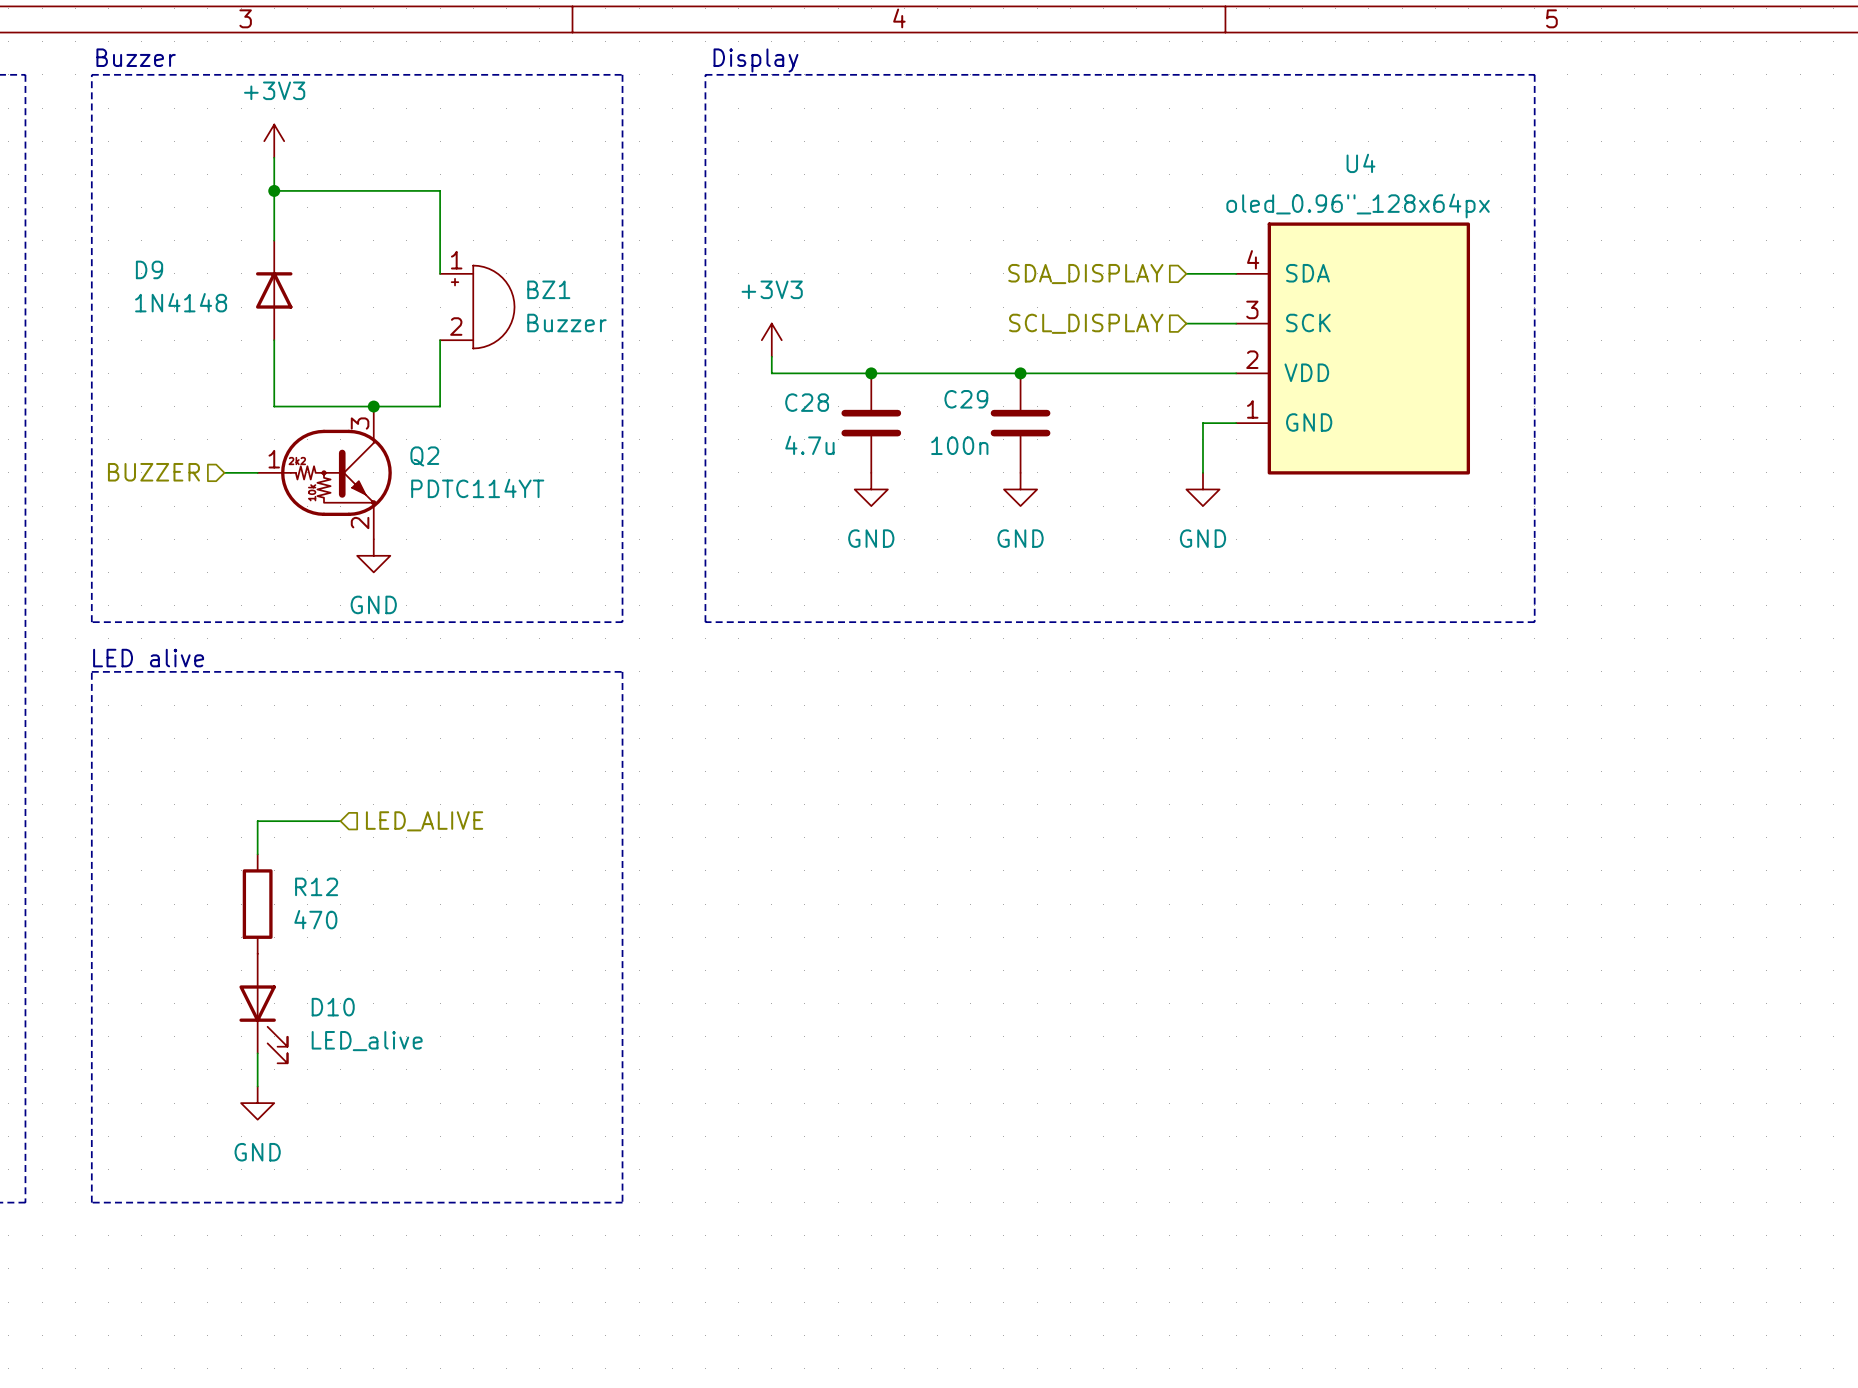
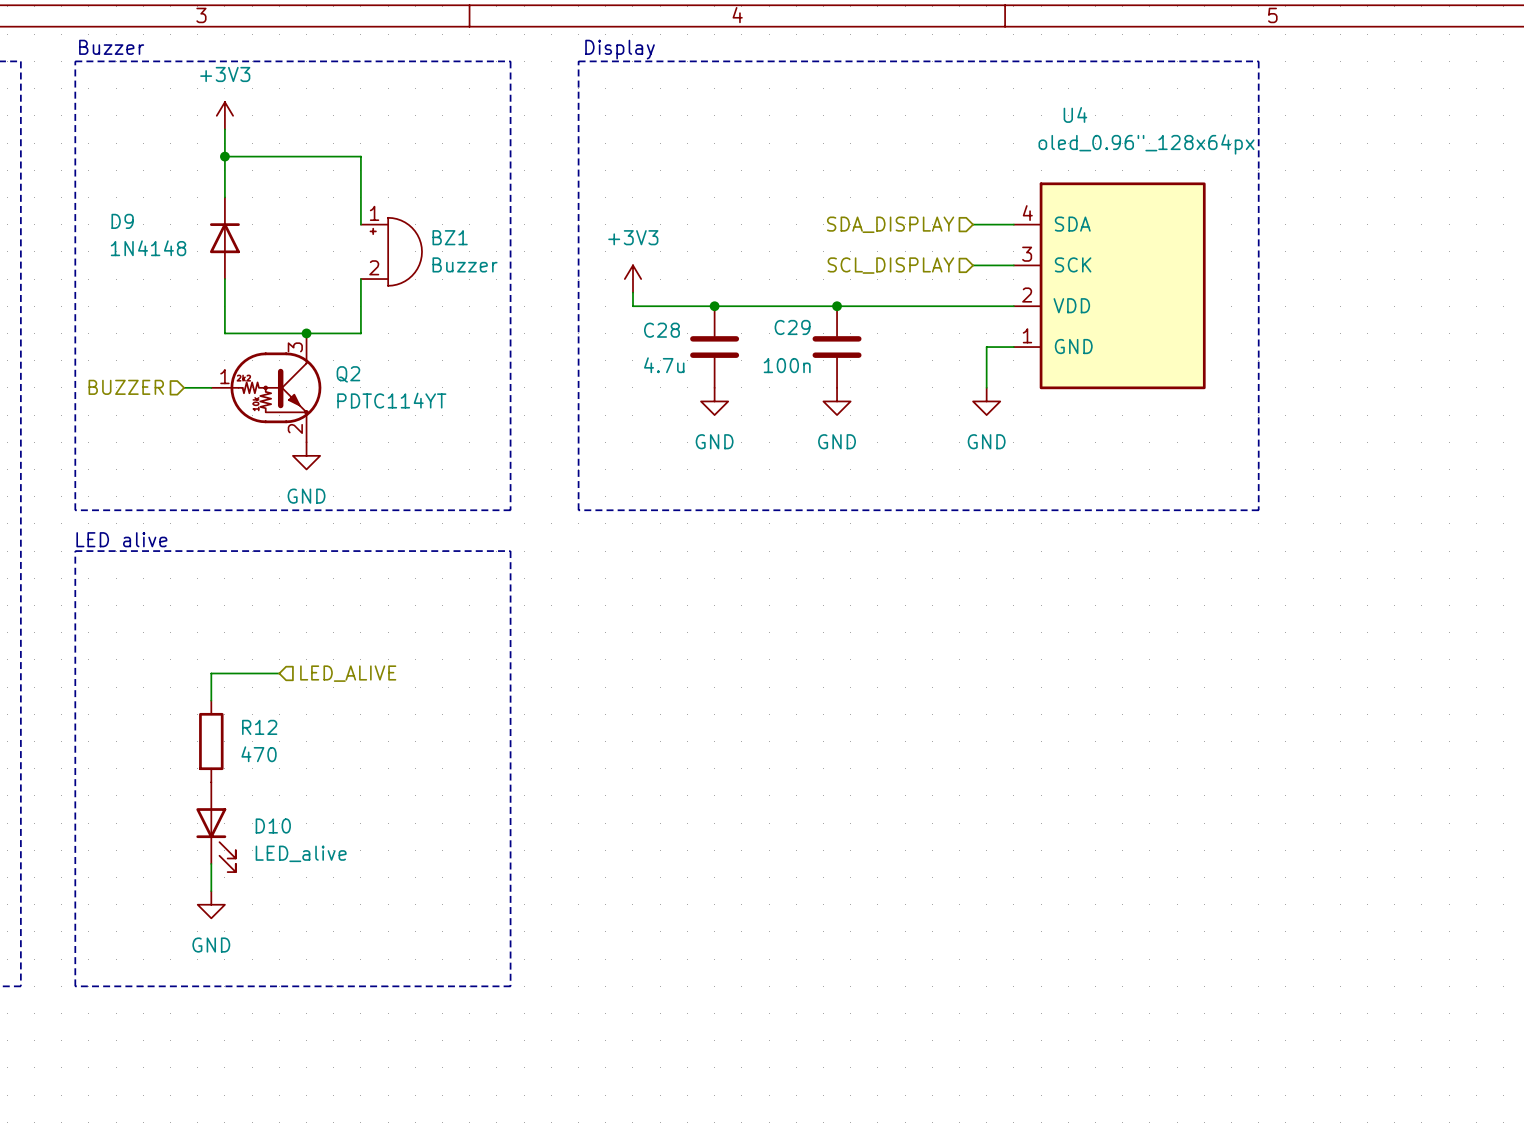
U4 name position: U4 (1360, 163) -> U4 (1075, 114)
U4 value position: oled_0.96"_128x64px (1358, 205) -> oled_0.96"_128x64px (1146, 144)

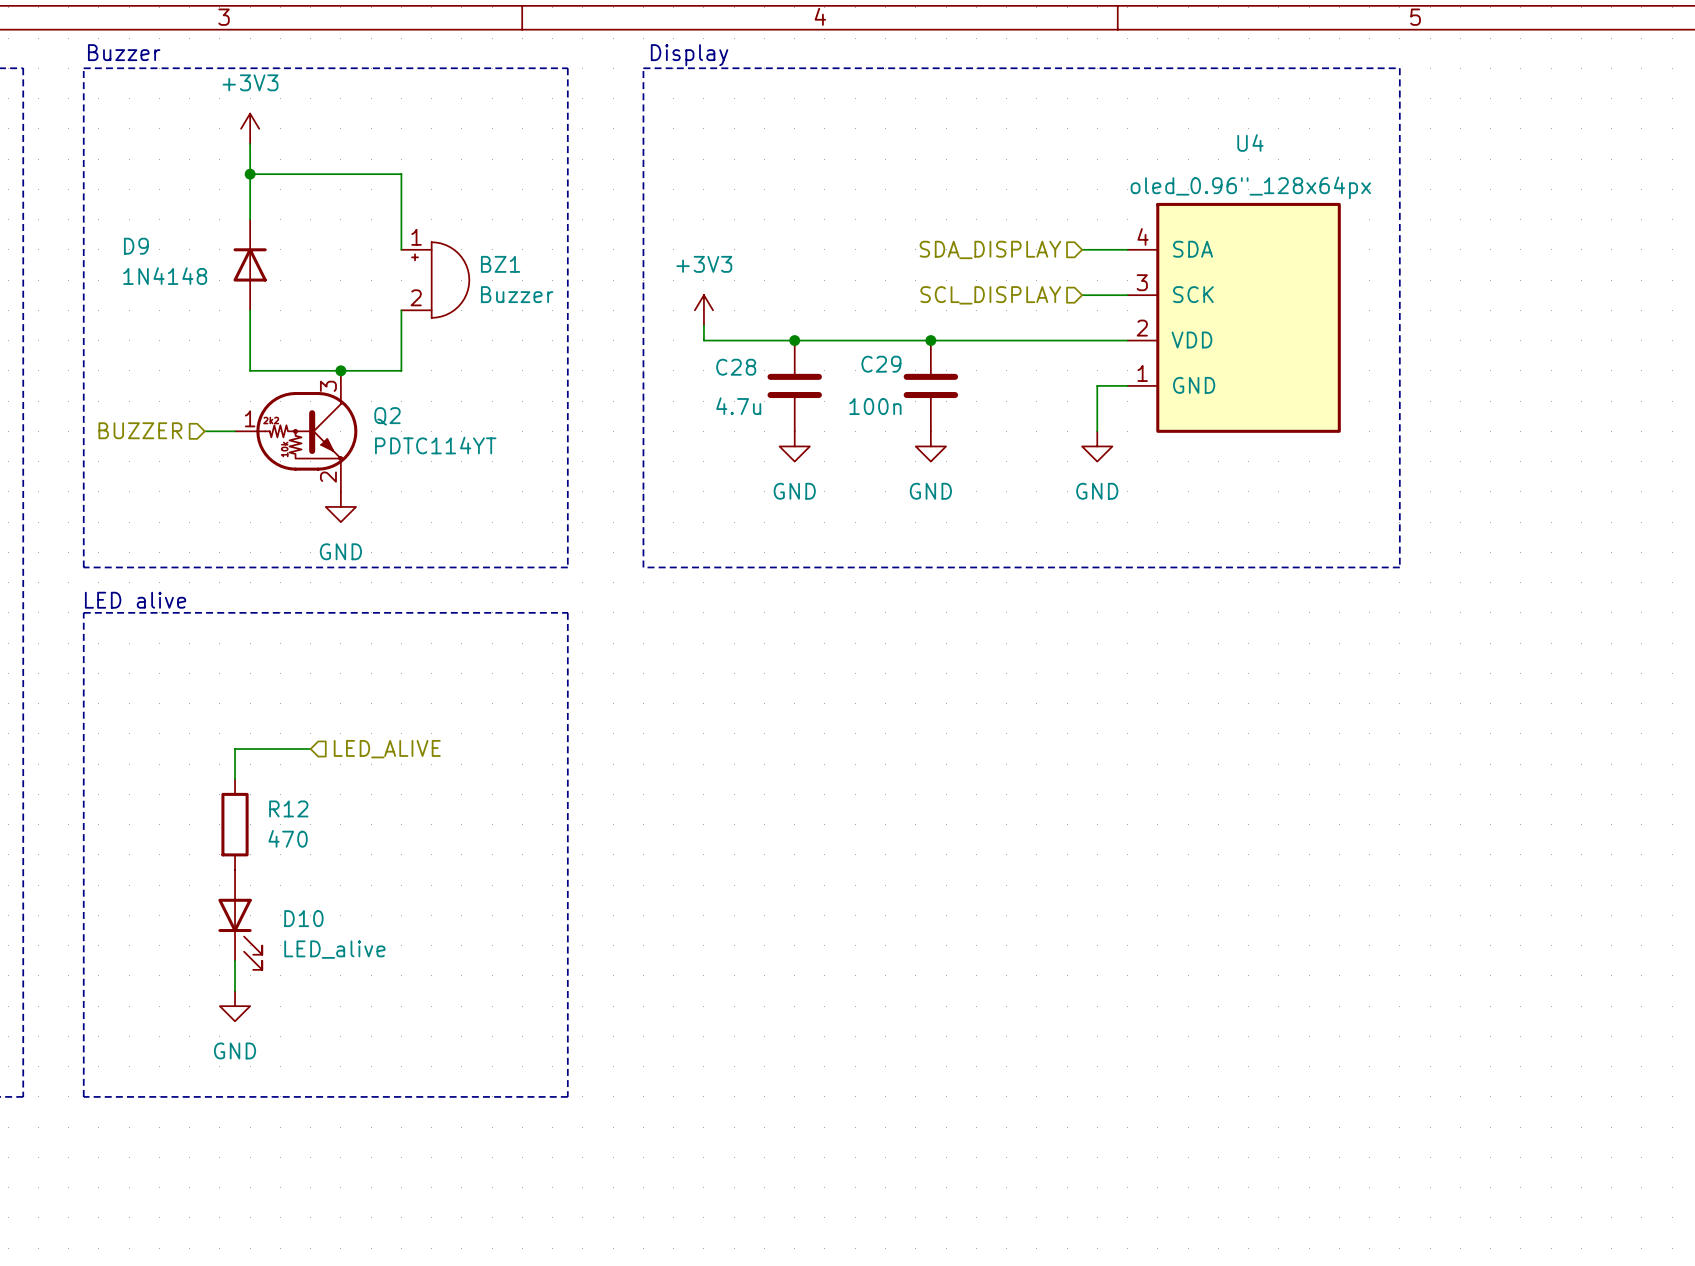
U4 name position: U4 (1075, 114) -> U4 (1250, 142)
U4 value position: oled_0.96"_128x64px (1146, 144) -> oled_0.96"_128x64px (1250, 187)

